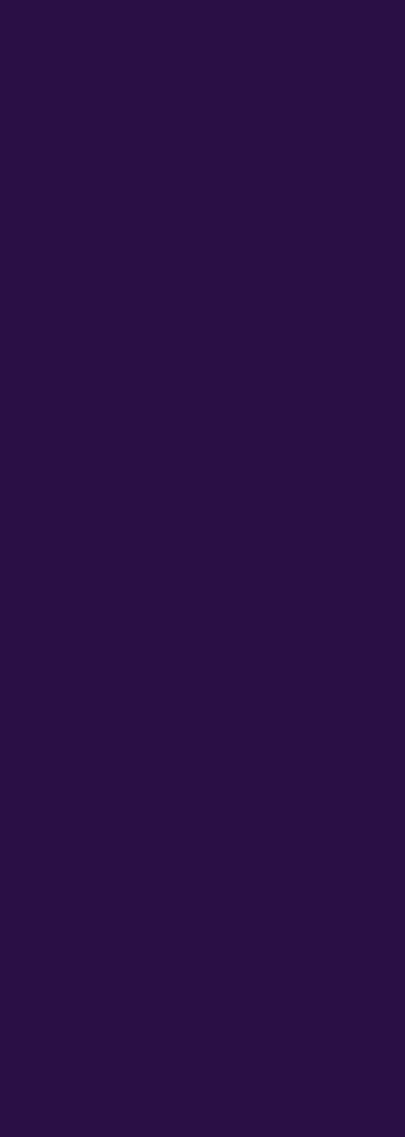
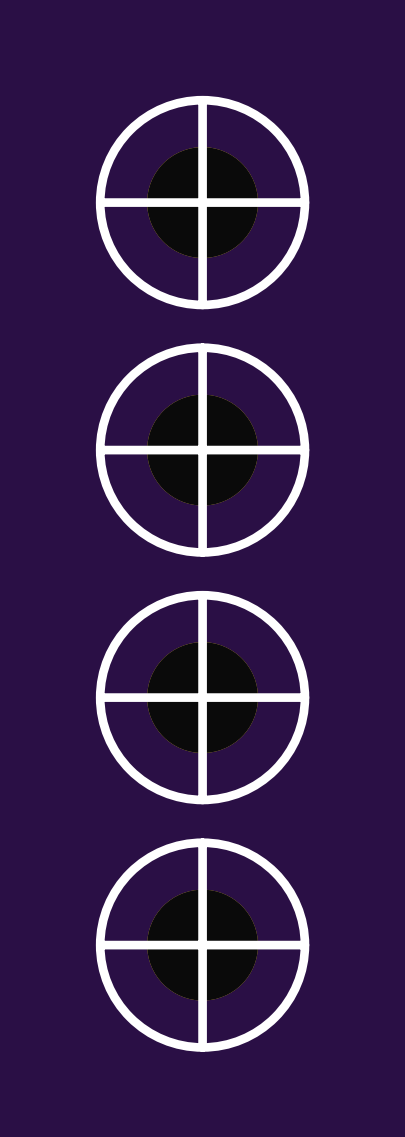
part: none -> (202, 202)
part: none -> (202, 450)
part: none -> (202, 697)
part: none -> (202, 945)

